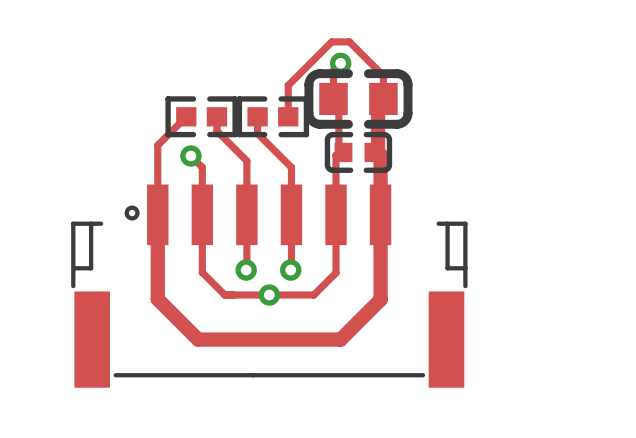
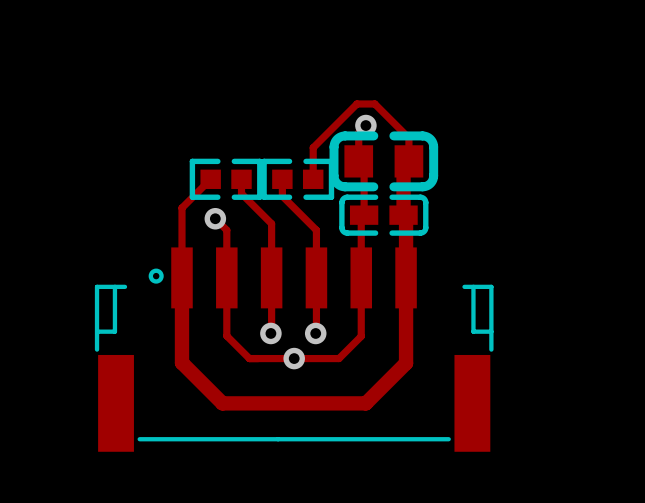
part footprint: [324, 131, 393, 173] -> [339, 194, 429, 236]

